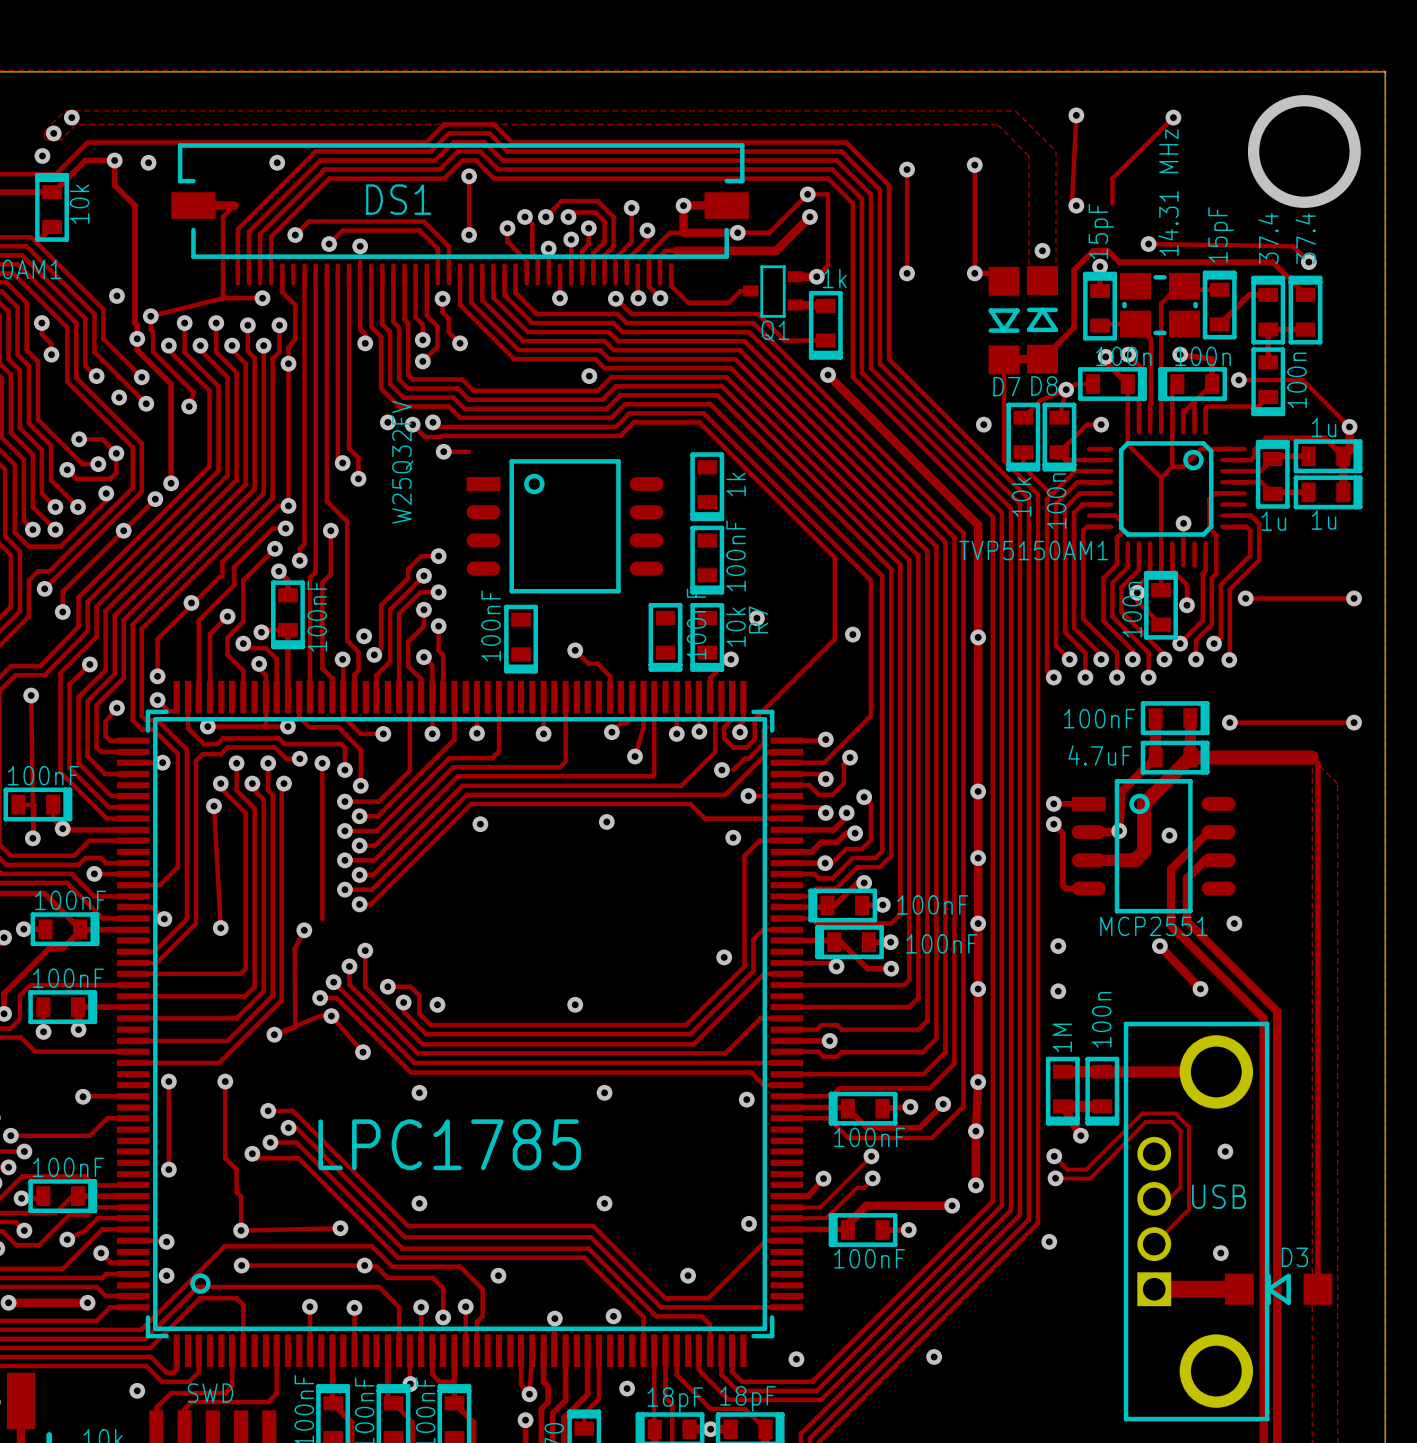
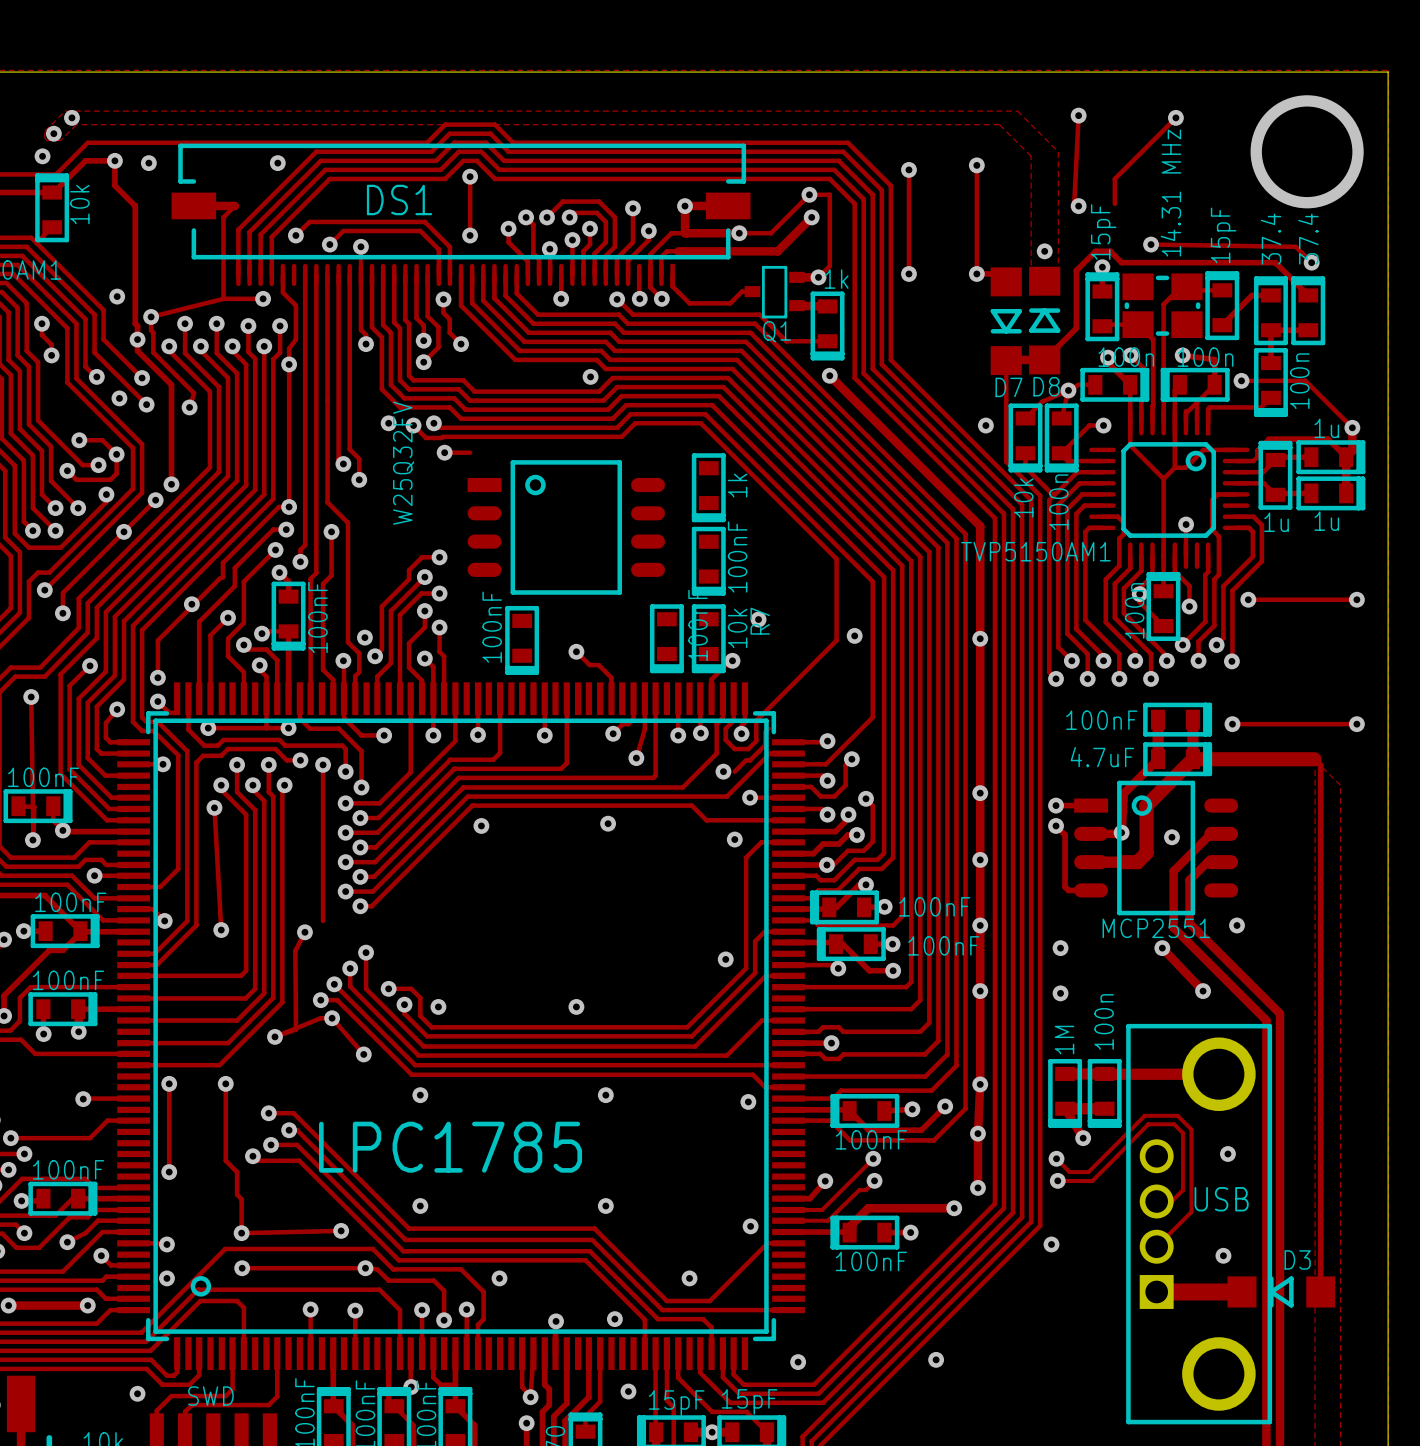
part value: 18pF (748, 1398) -> 15pF (749, 1401)
part value: 18pF (675, 1400) -> 15pF (676, 1403)

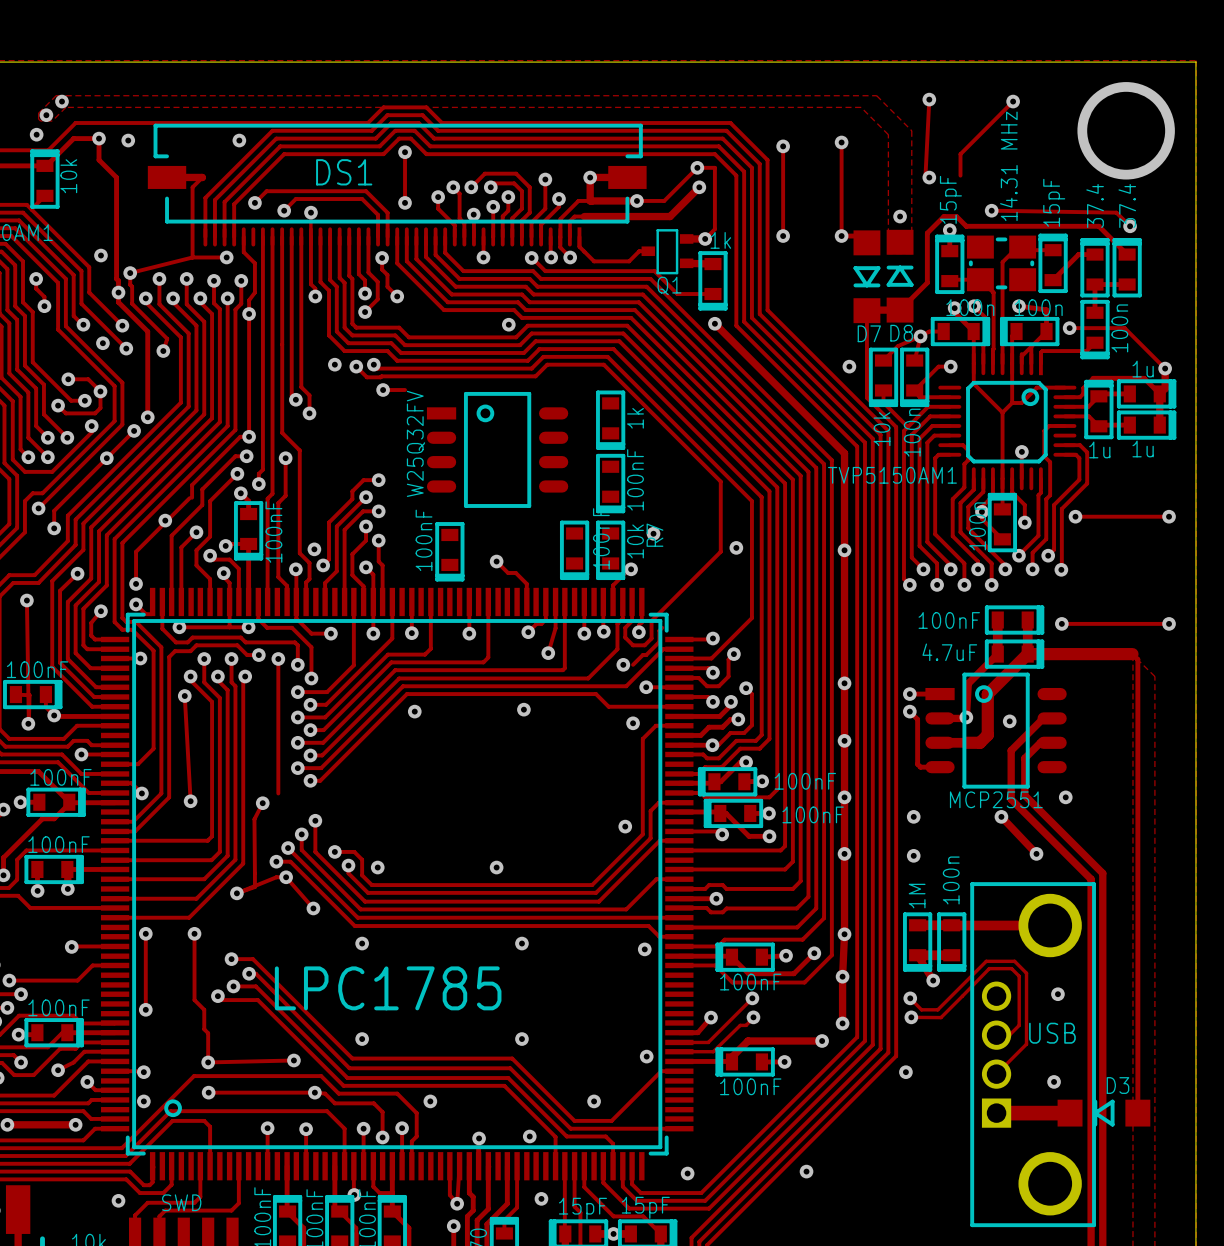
part footprint: [467, 460, 666, 595] -> [426, 391, 569, 508]
part value position: W25Q32FV (403, 463) -> W25Q32FV (415, 443)

